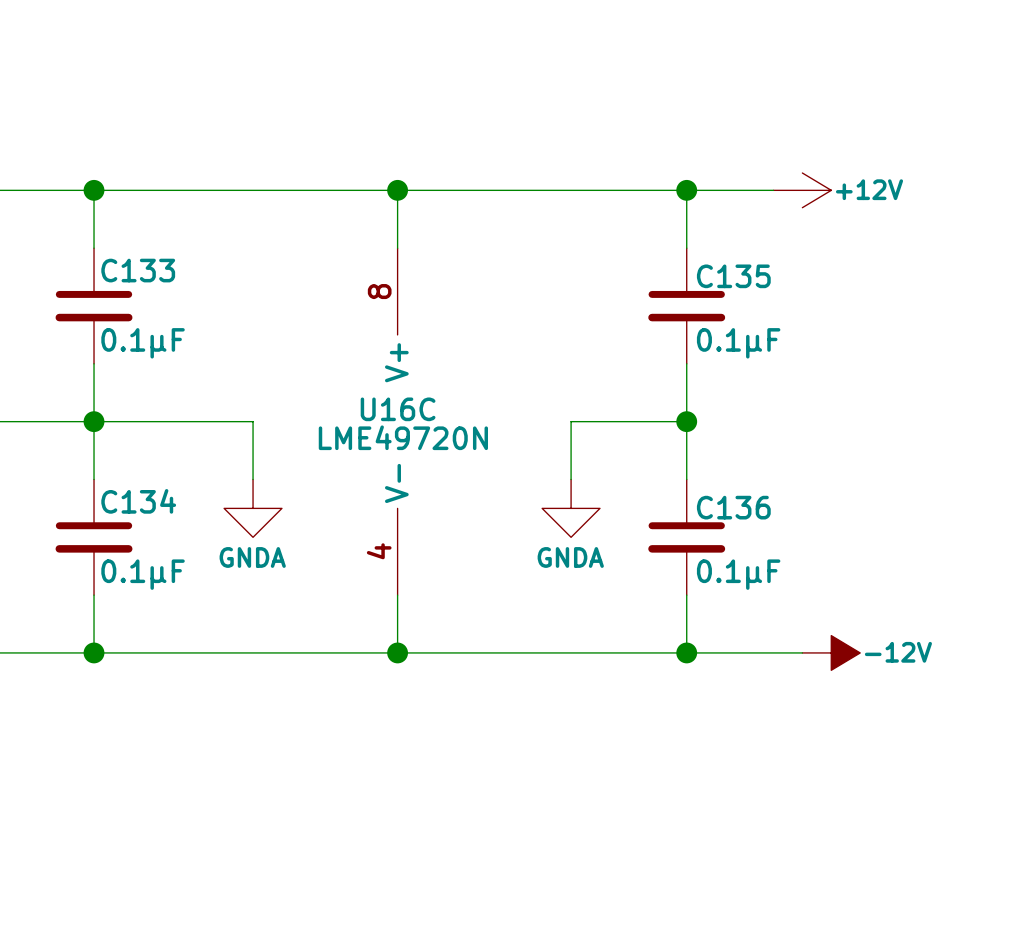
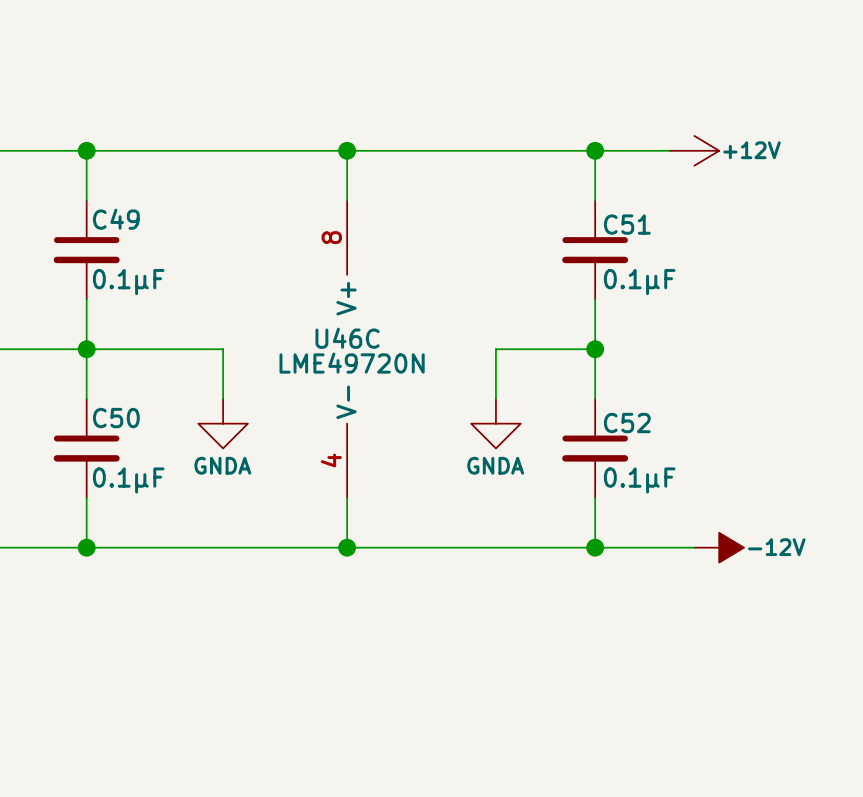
C133 name: C133 (138, 270) -> C49 (116, 219)
C135 name: C135 (733, 276) -> C51 (627, 224)
U16C name: U16C (398, 409) -> U46C (347, 338)
C134 name: C134 (138, 501) -> C50 (116, 418)
C136 name: C136 (733, 507) -> C52 (627, 423)

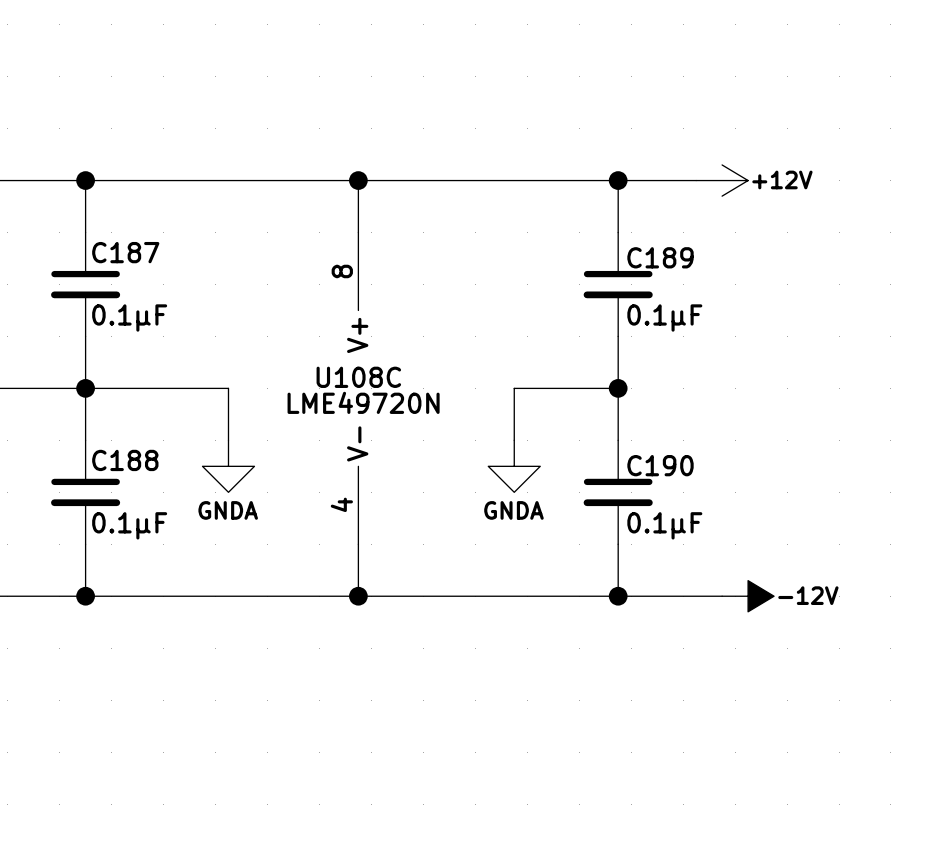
C49 name: C49 (116, 219) -> C187 (125, 252)
C51 name: C51 (627, 224) -> C189 (660, 257)
U46C name: U46C (347, 338) -> U108C (358, 377)
C50 name: C50 (116, 418) -> C188 (125, 460)
C52 name: C52 (627, 423) -> C190 (660, 465)

